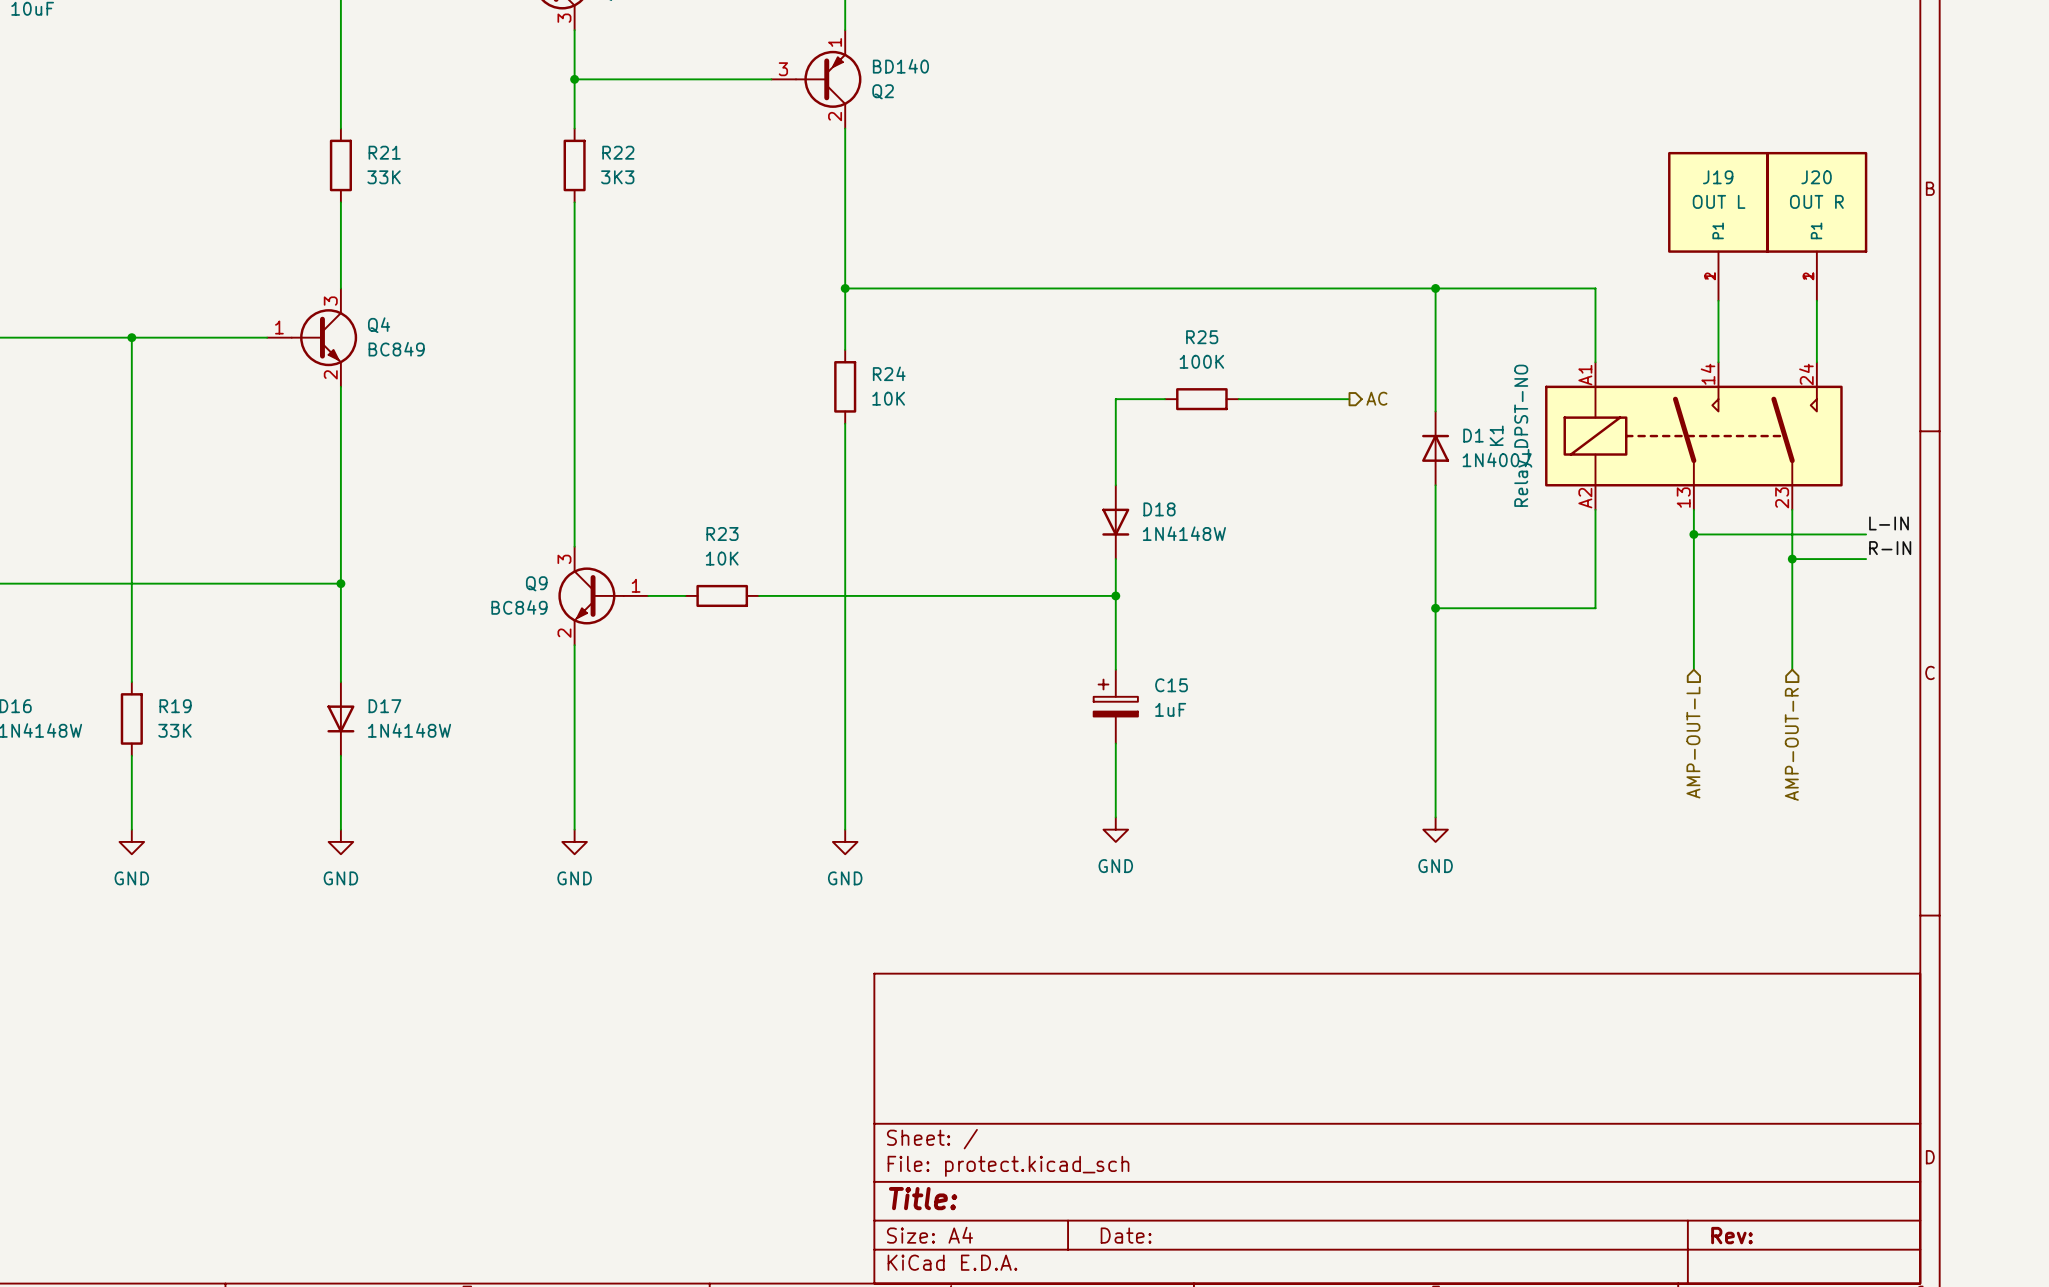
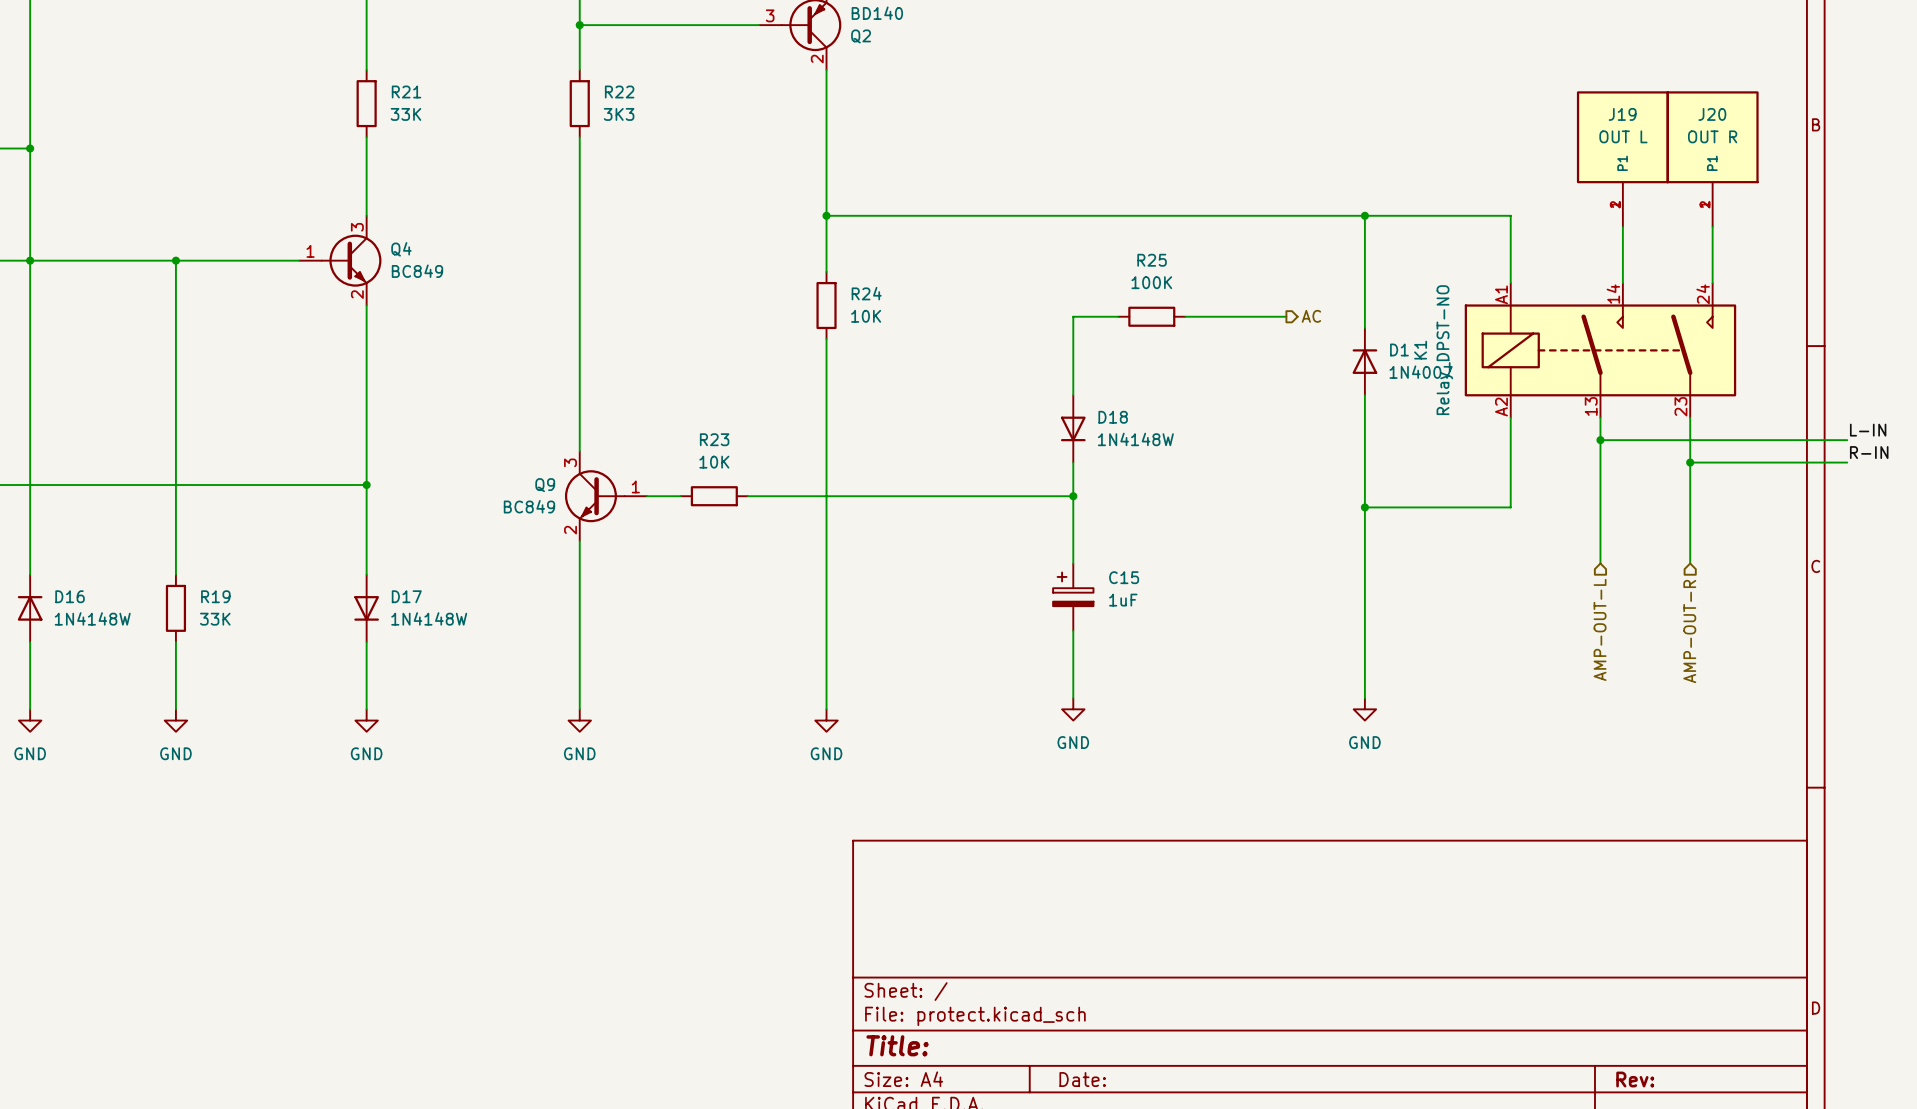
label position: L-IN (1889, 523) -> L-IN (1868, 430)
wire: none -> (1757, 440) (1847, 440)
label position: R-IN (1890, 548) -> R-IN (1869, 452)
wire: none -> (1757, 462) (1847, 462)

